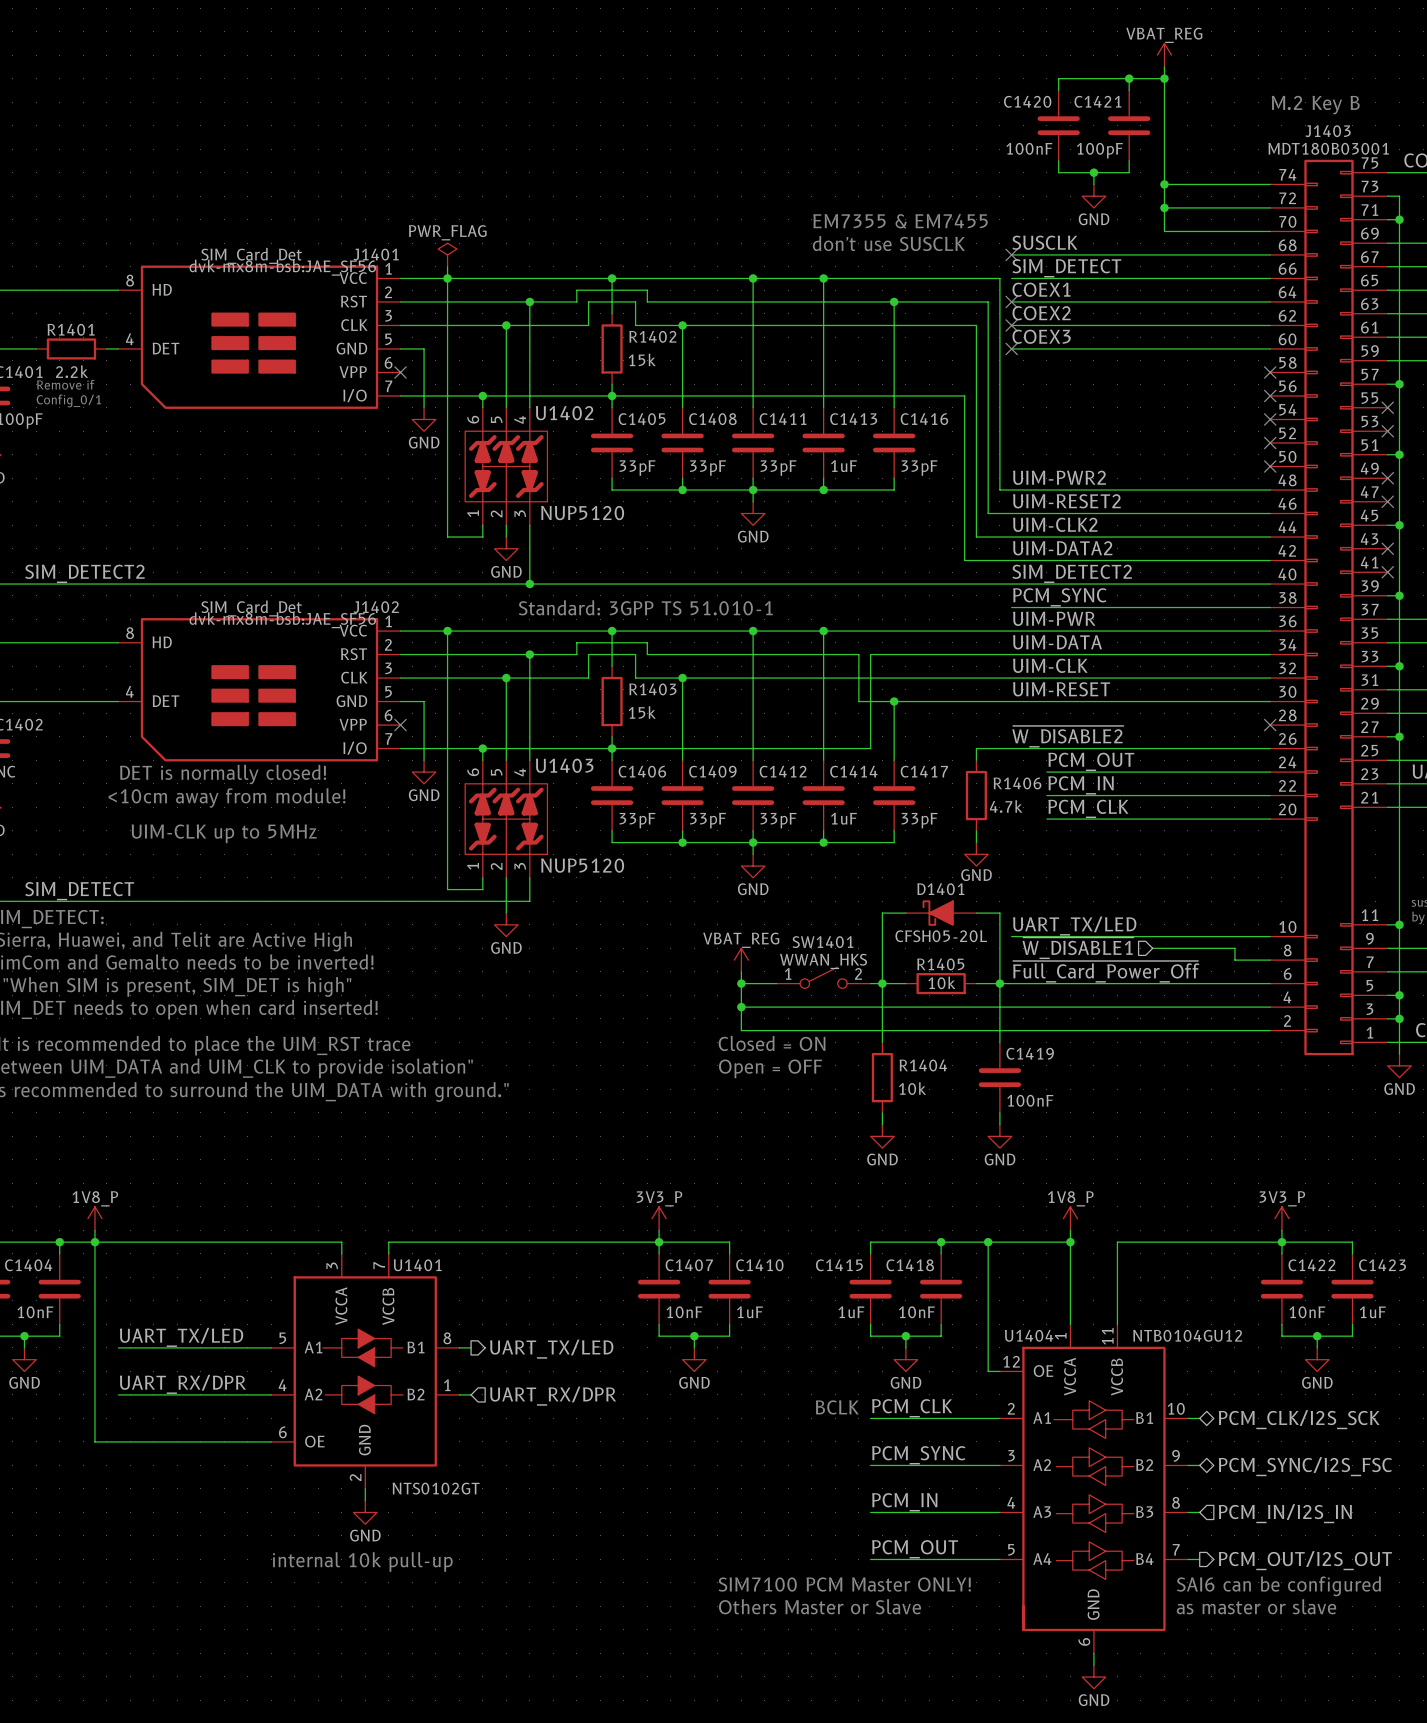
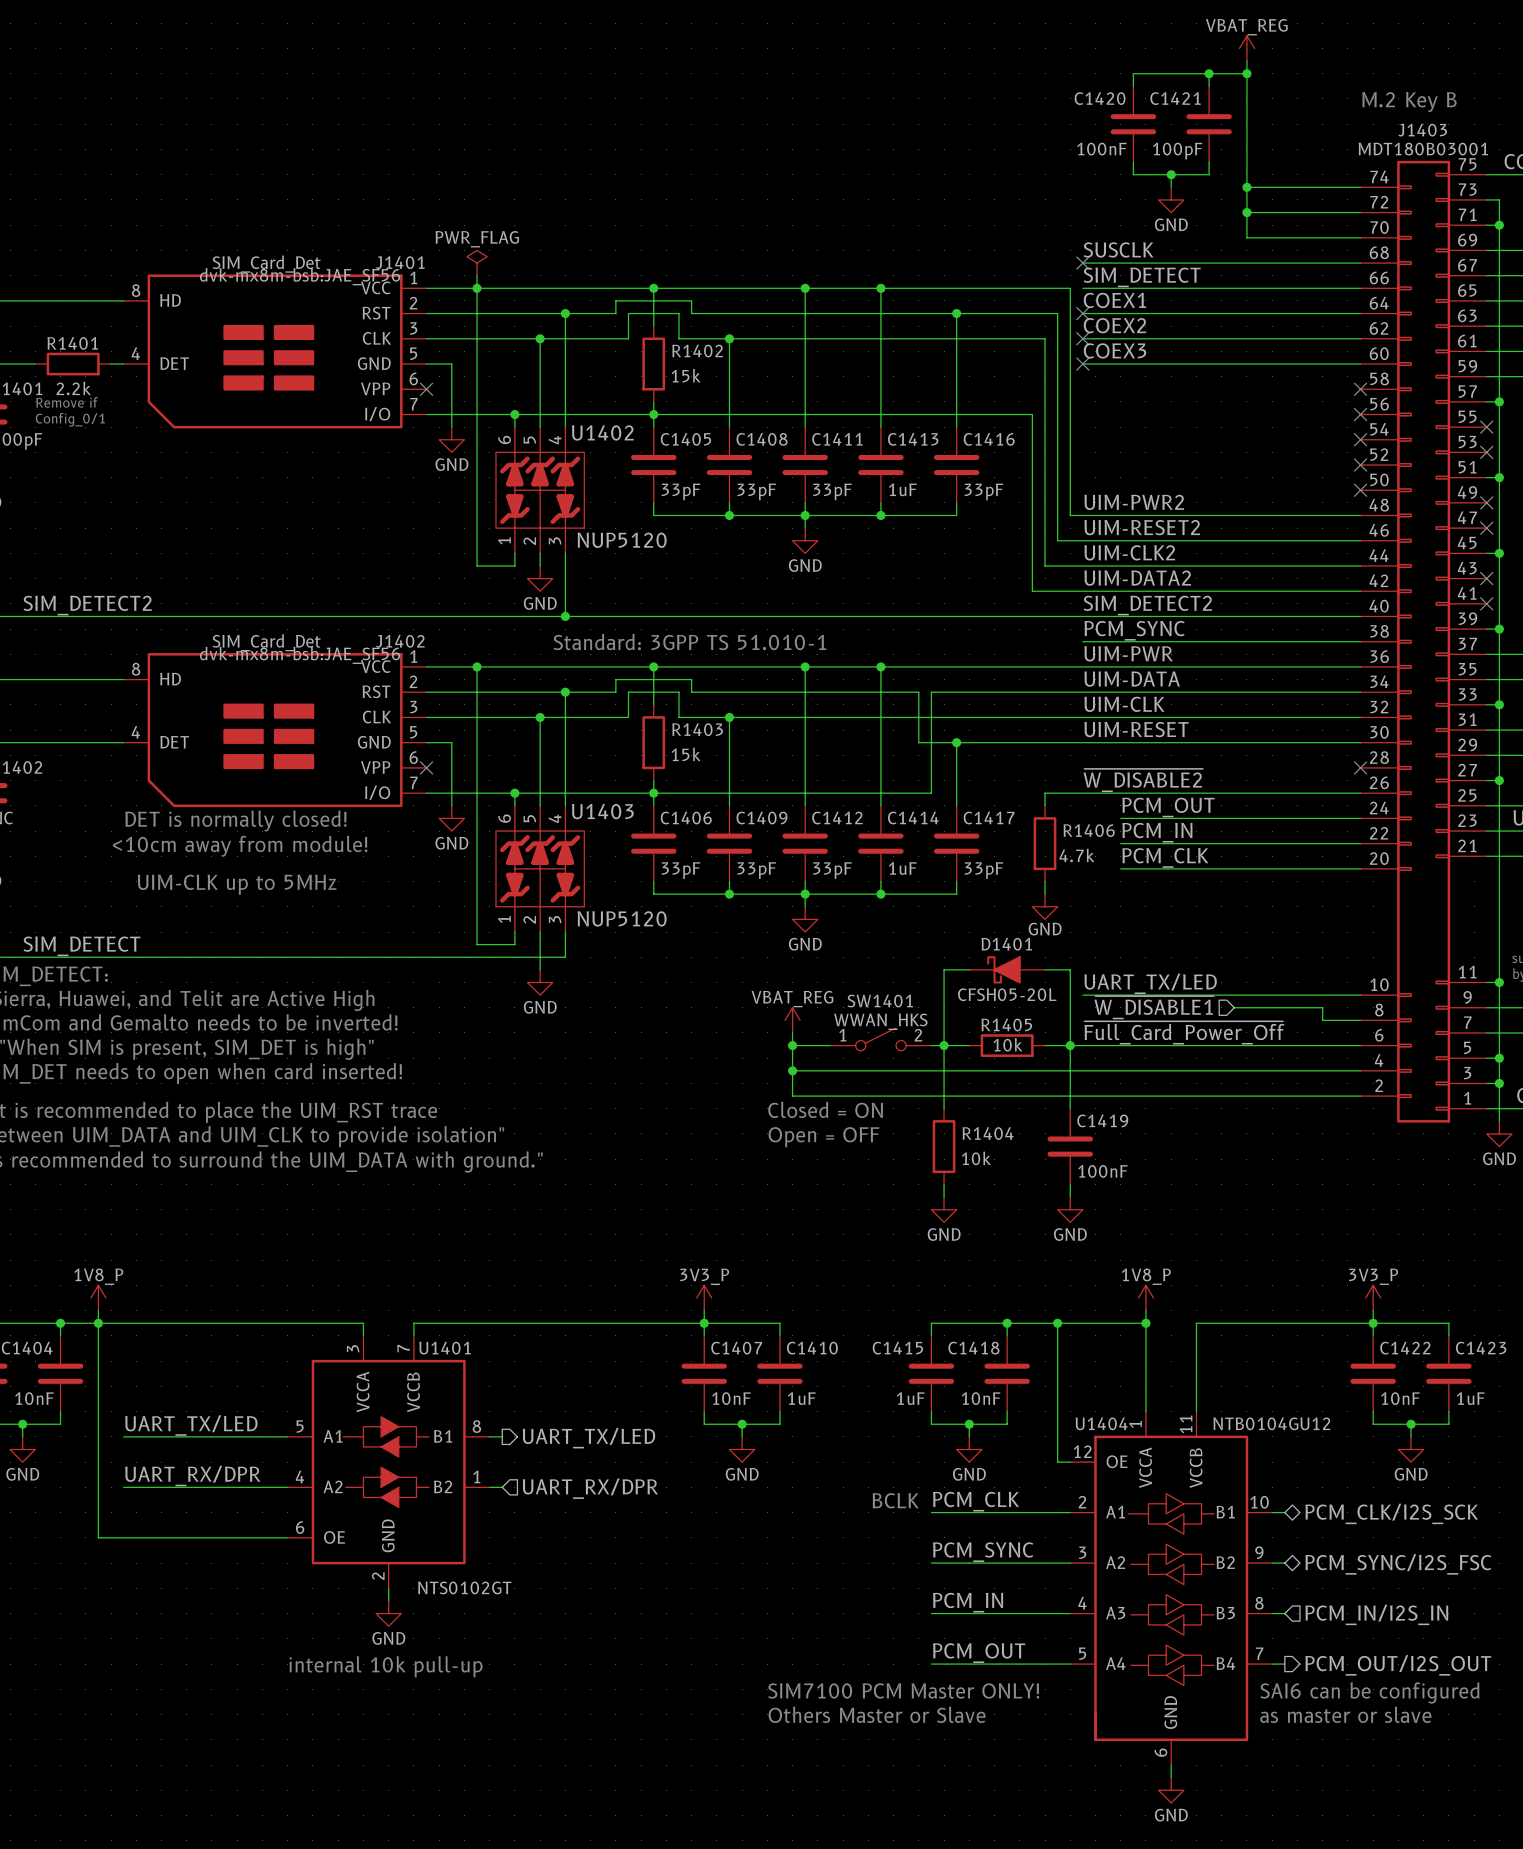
text: EM7355 & EM7455 (900, 221) -> none
text: don't use SUSCLK (888, 243) -> none

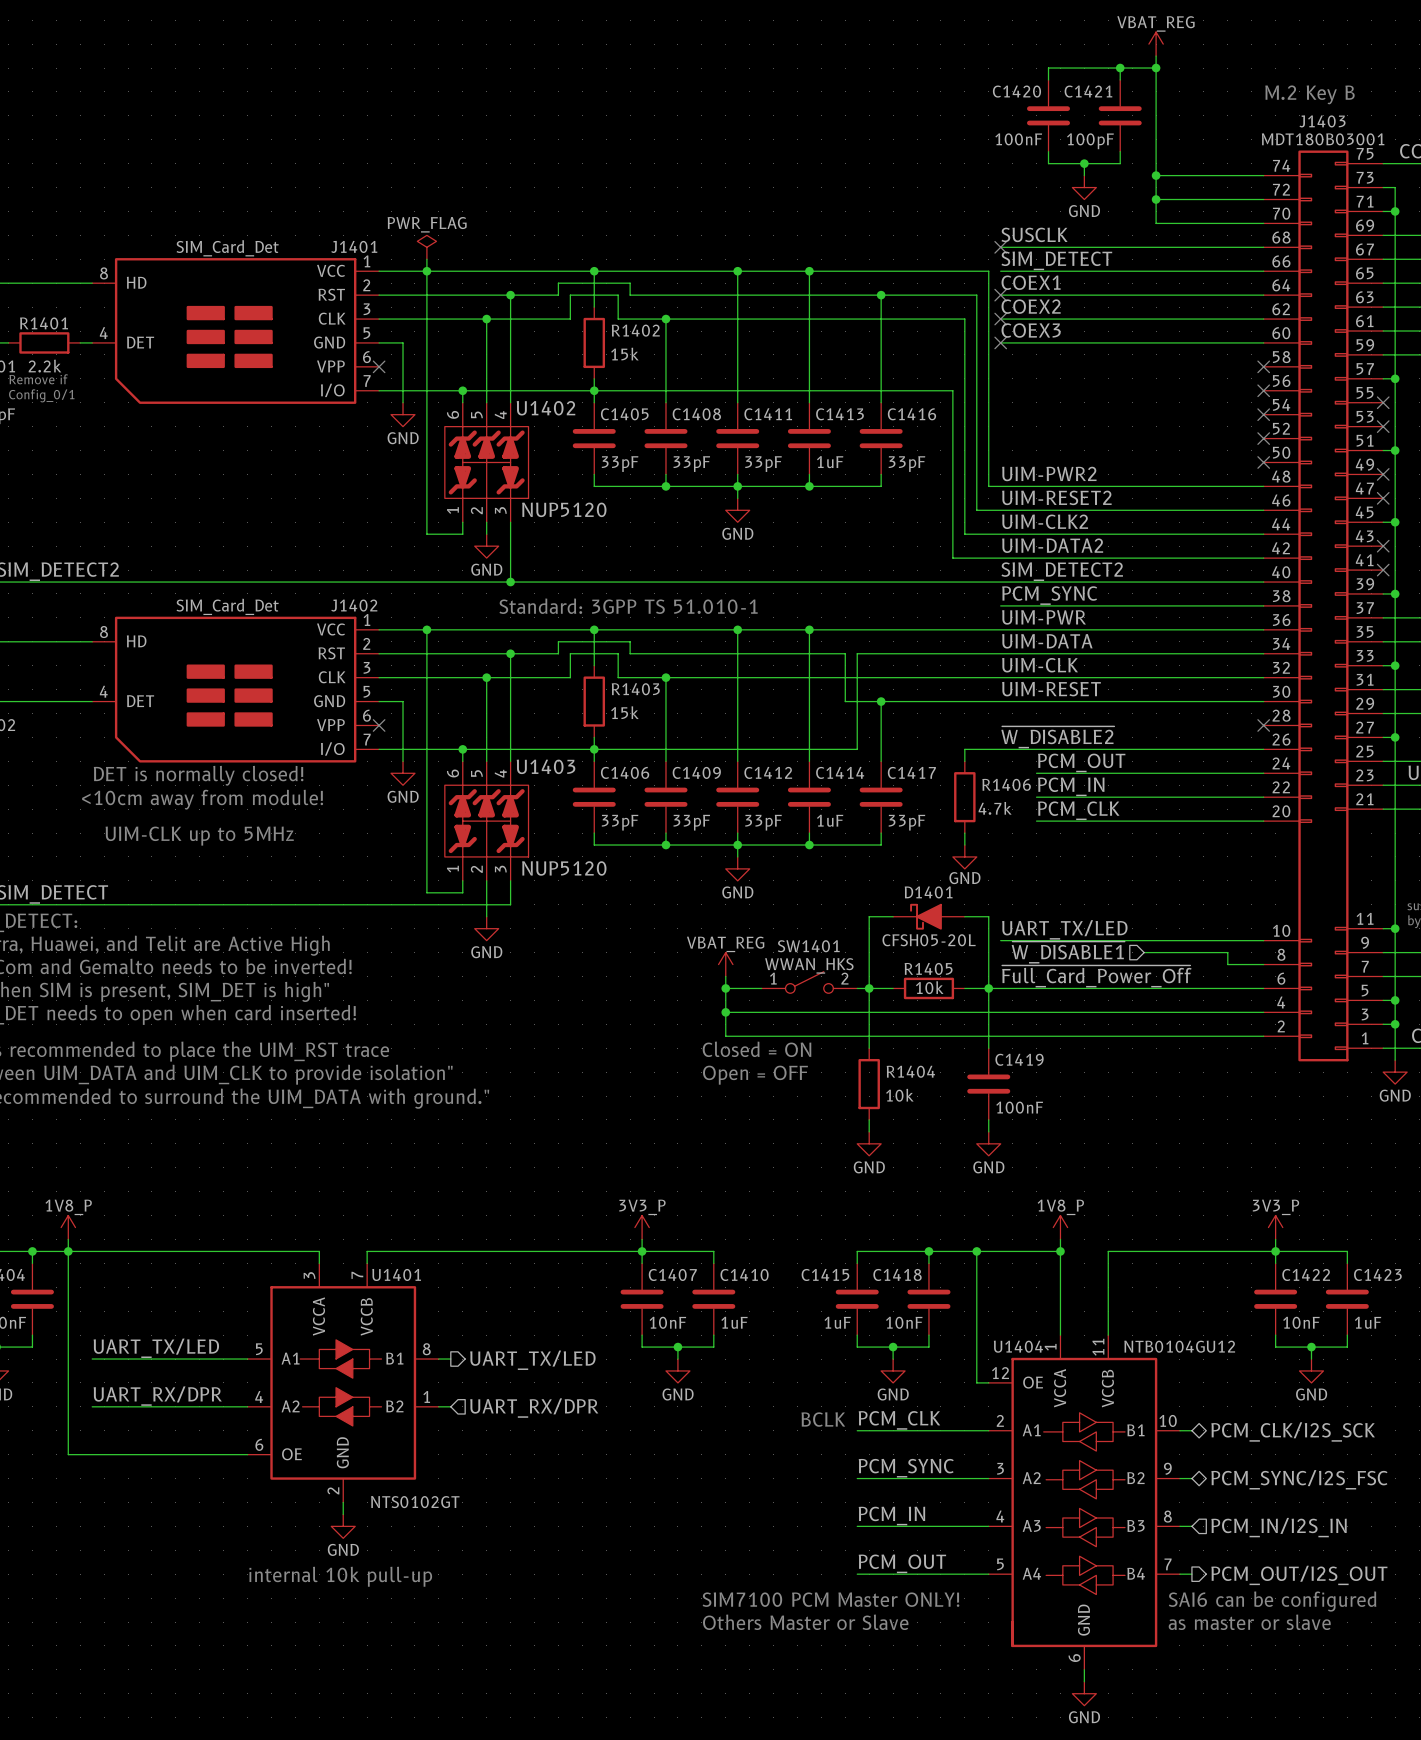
J1401 text: dvk-mx8m-bsb:JAE_SF56 (300, 276) -> none
J1402 text: dvk-mx8m-bsb:JAE_SF56 (300, 655) -> none

